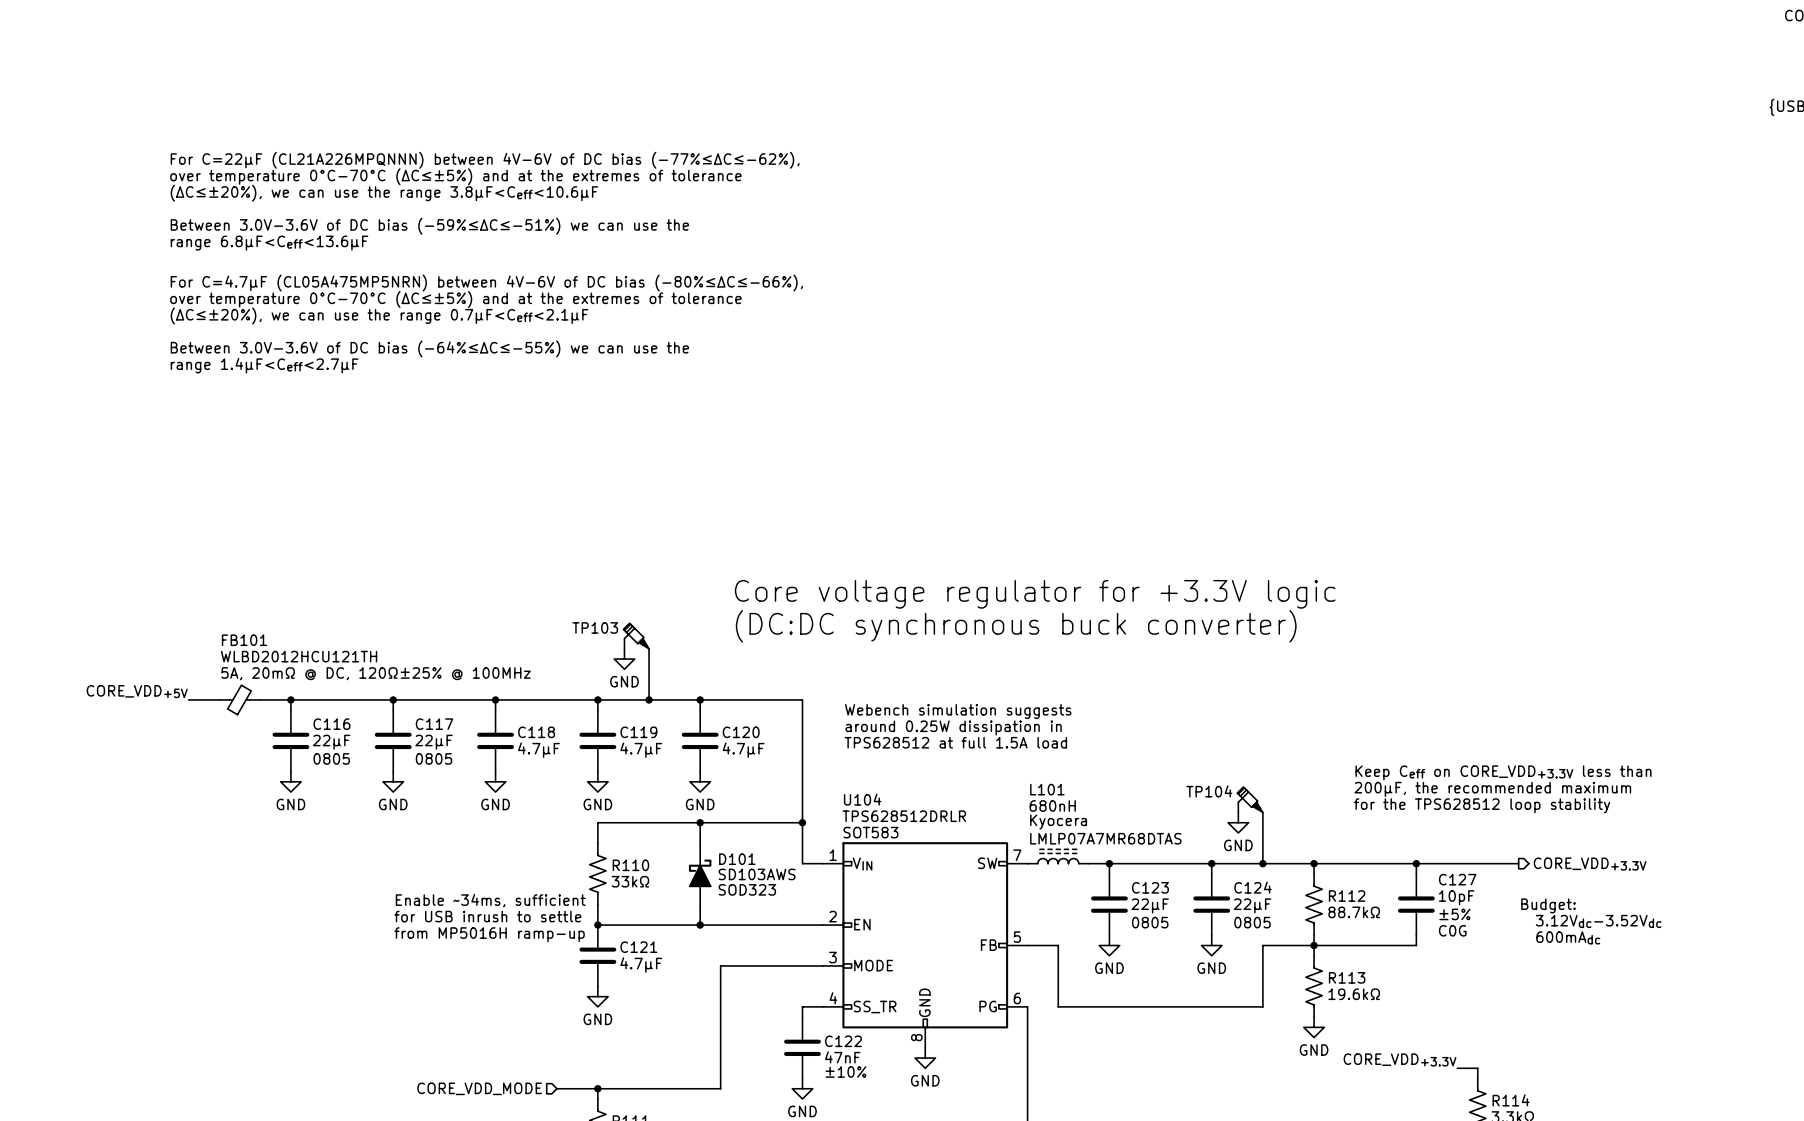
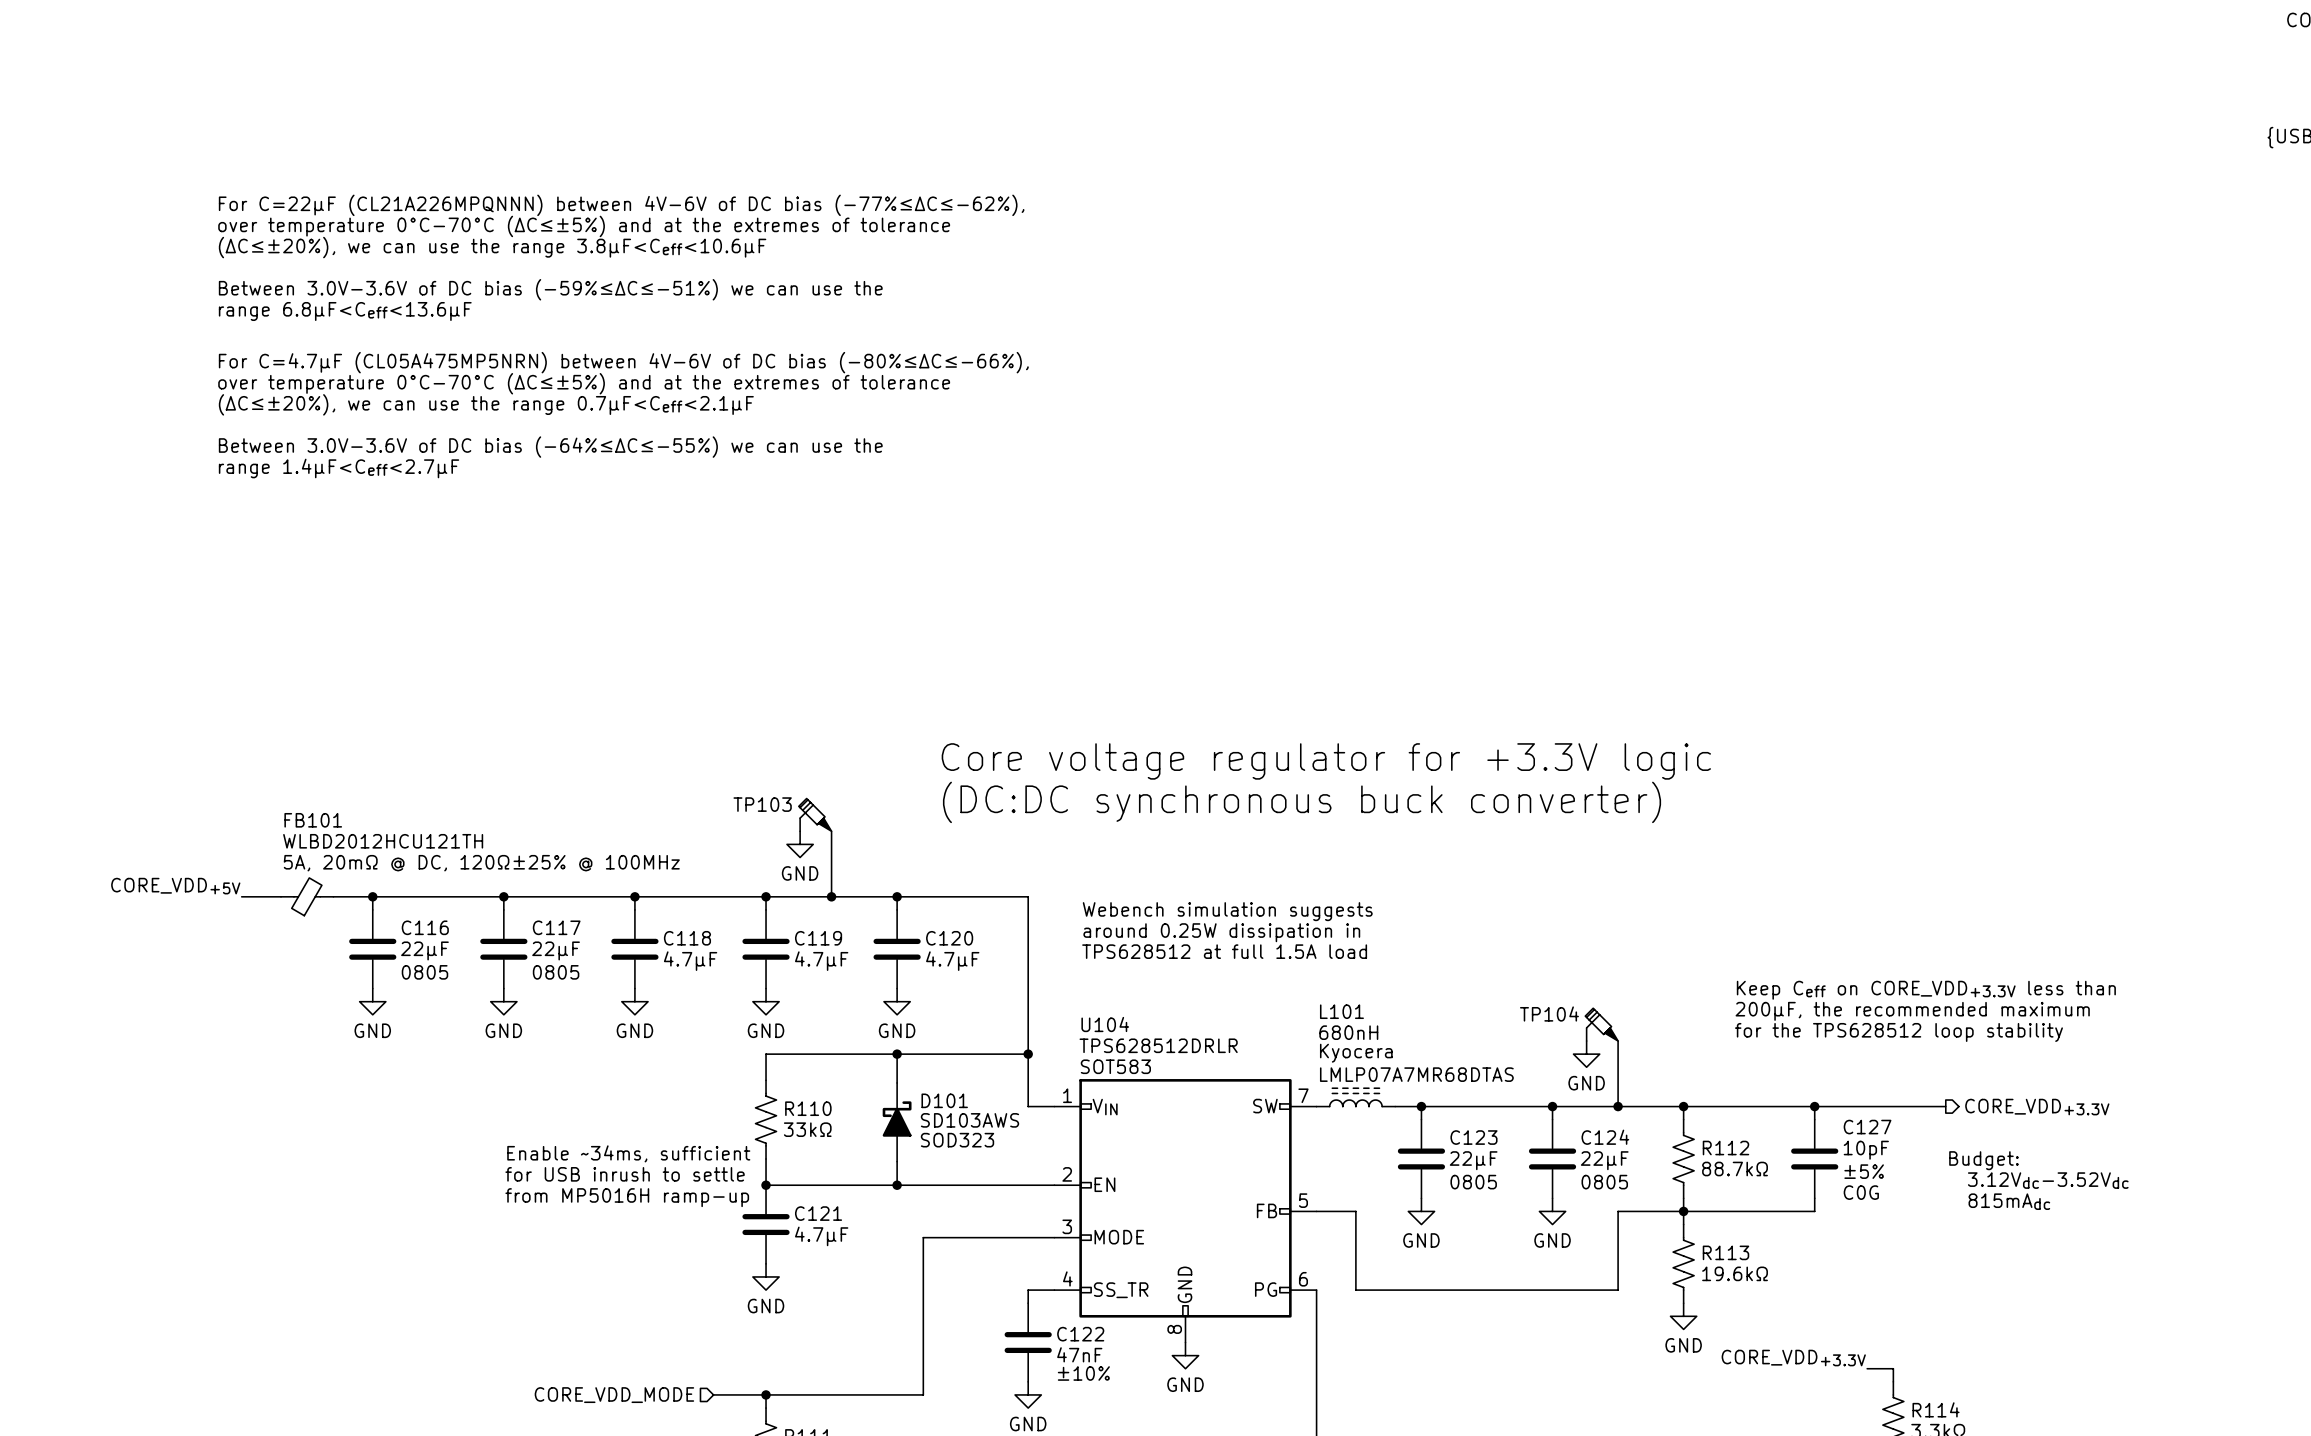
text: 600mAdc (1568, 937) -> 815mAdc (2009, 1201)

